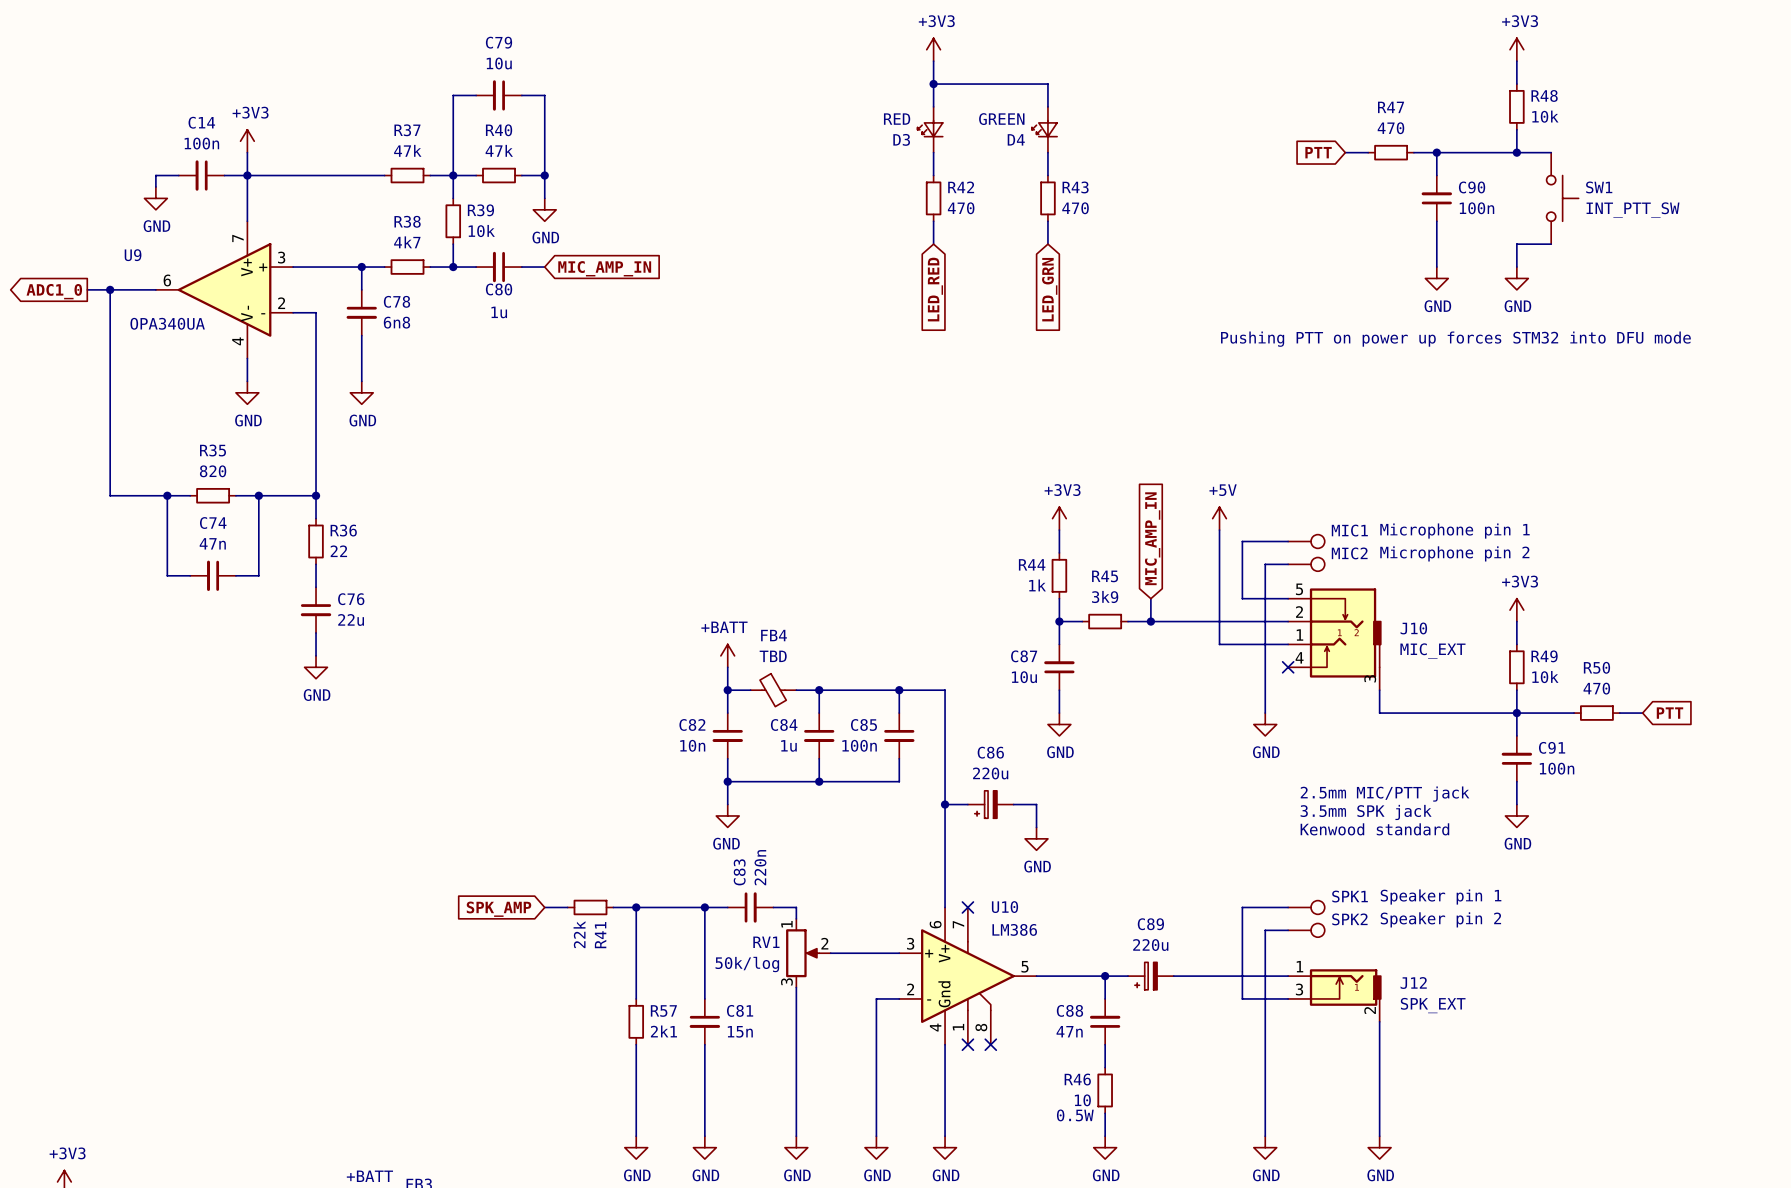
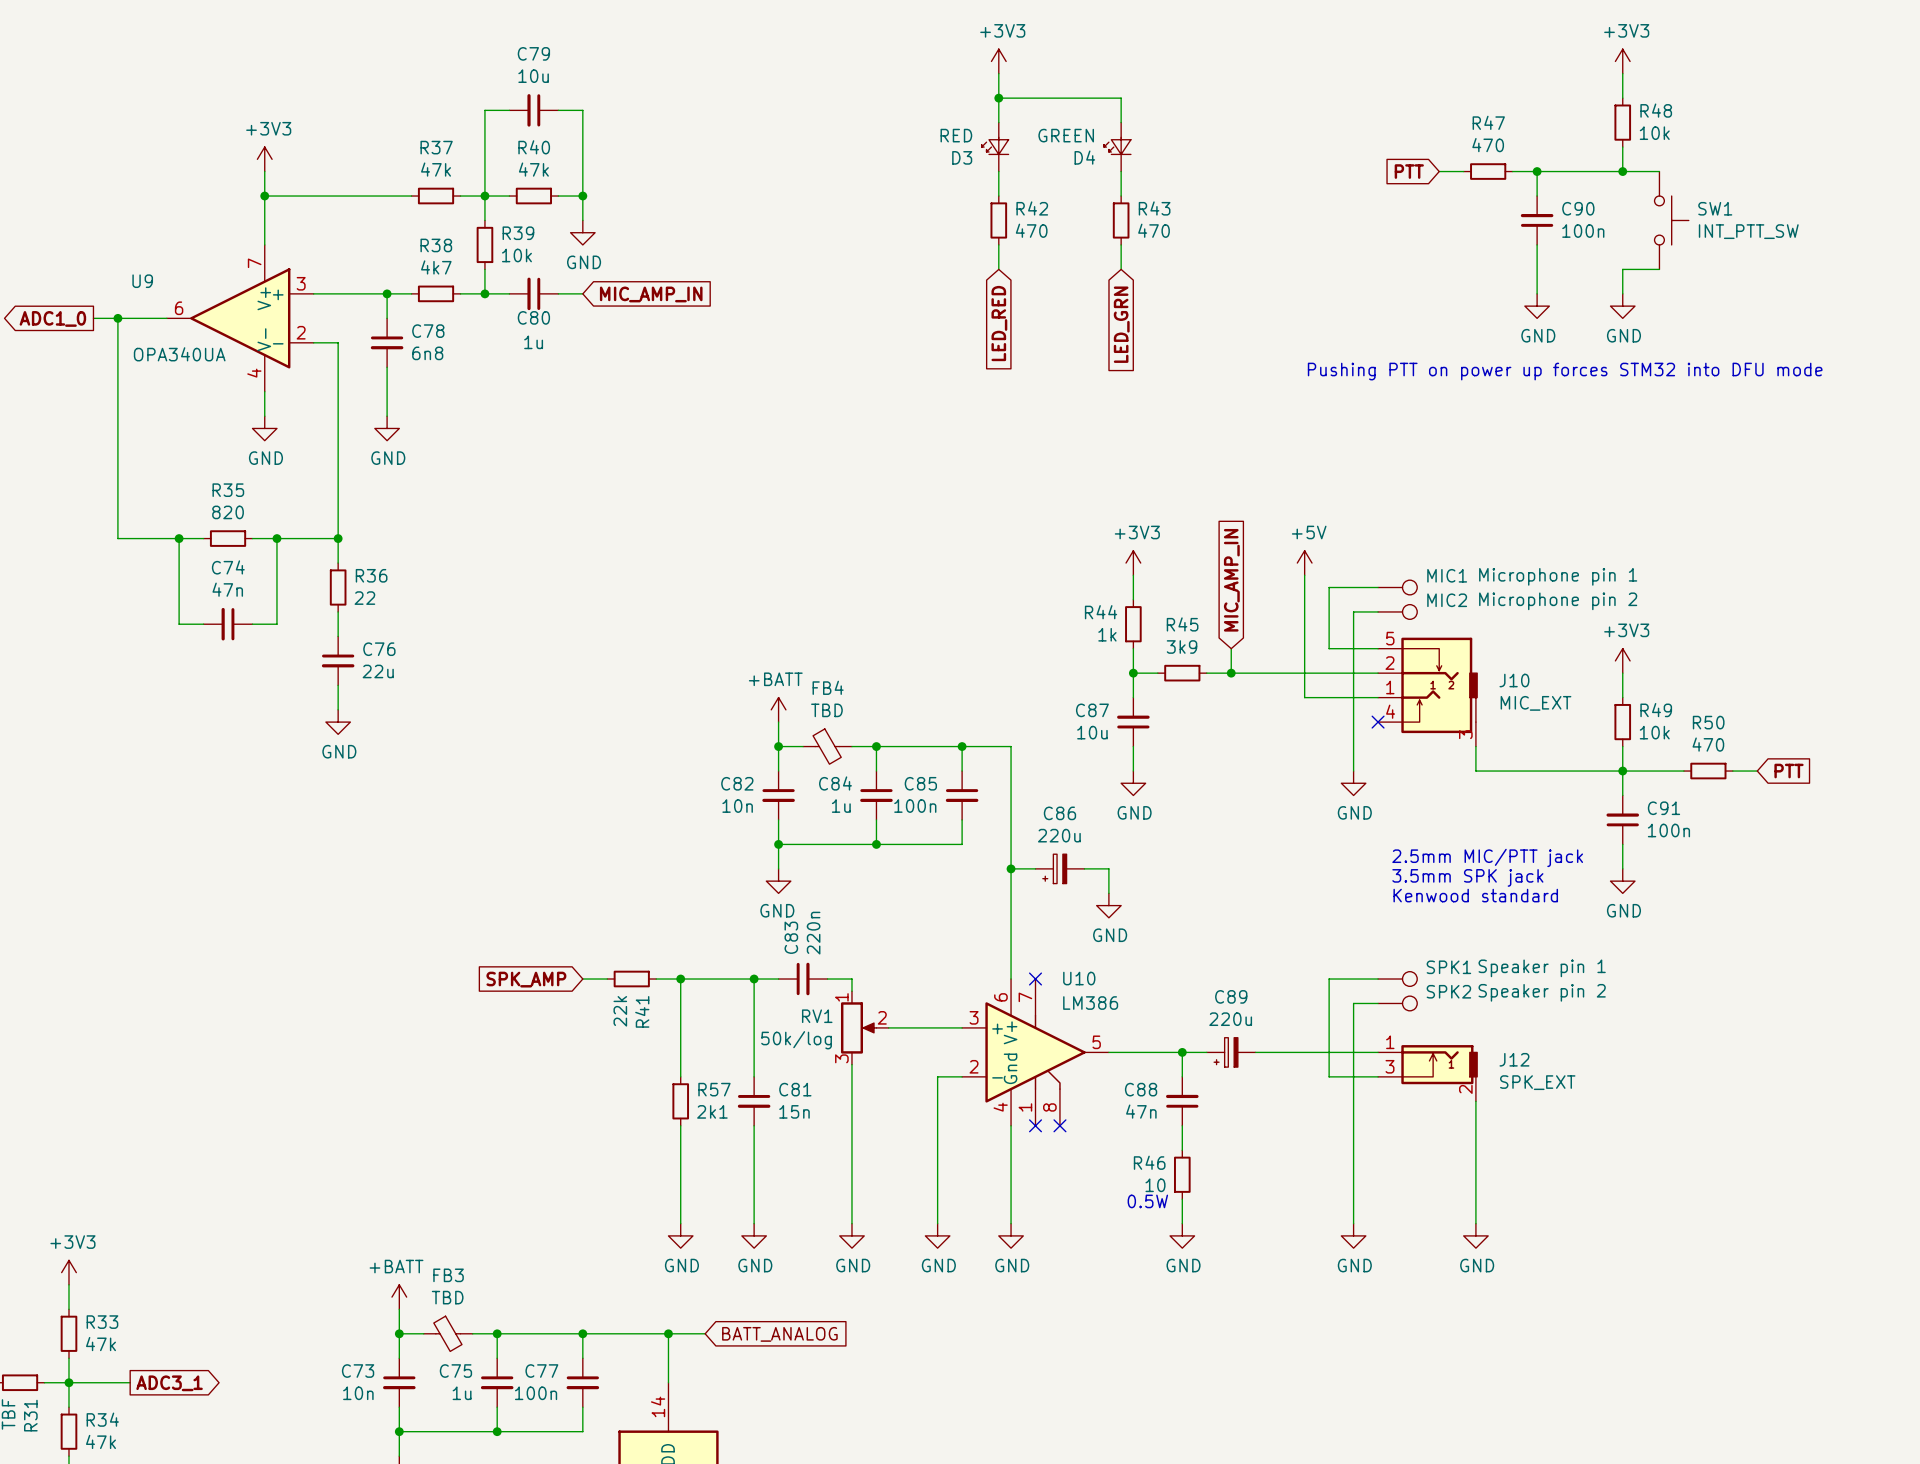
wire: (178, 175) (155, 175) (155, 186) -> none
C14: 100n (201, 175) -> none
wire: (224, 175) (247, 175) -> none
power symbol: GND (155, 198) -> none

